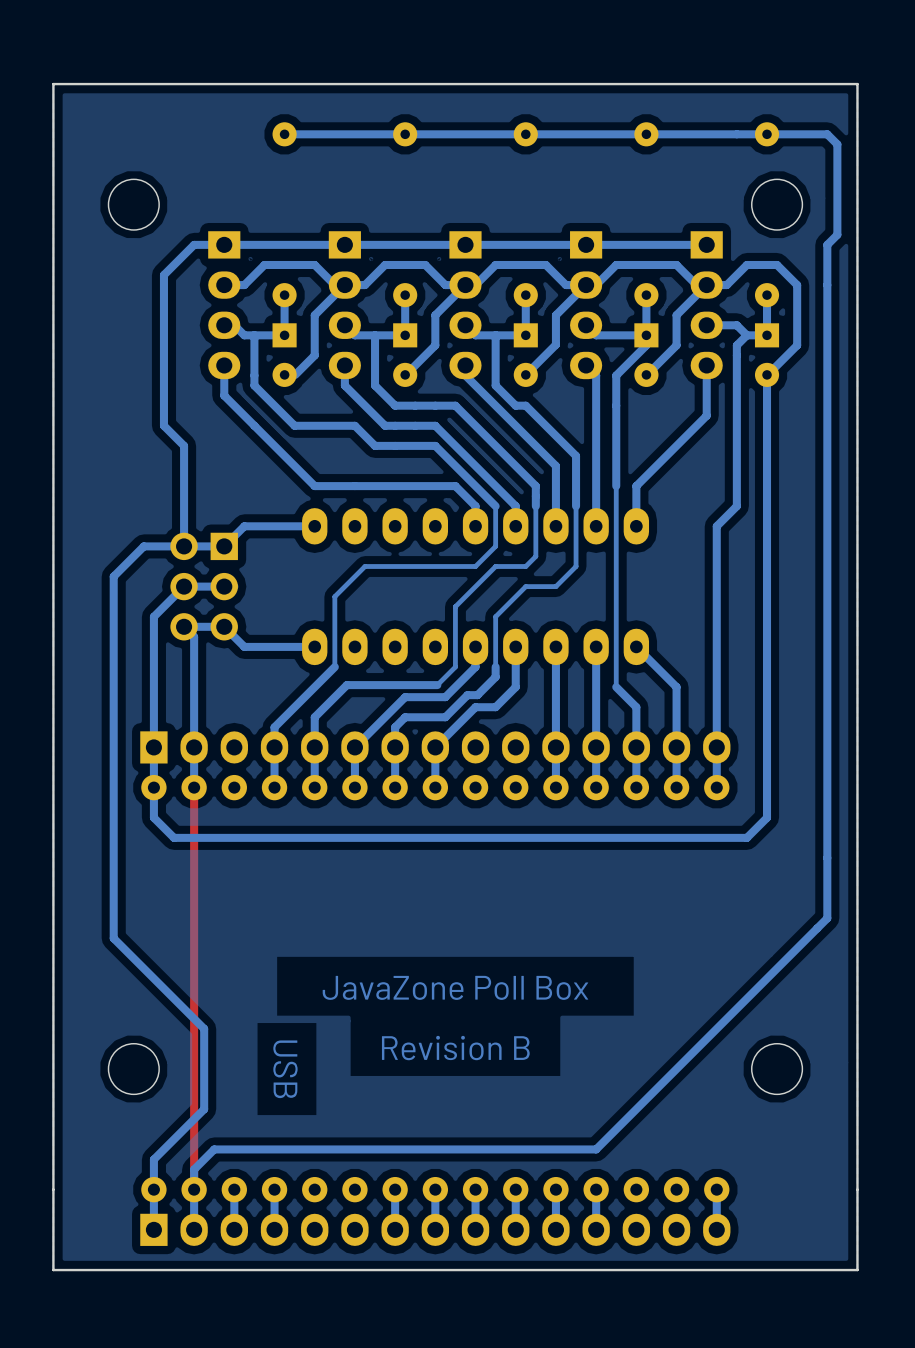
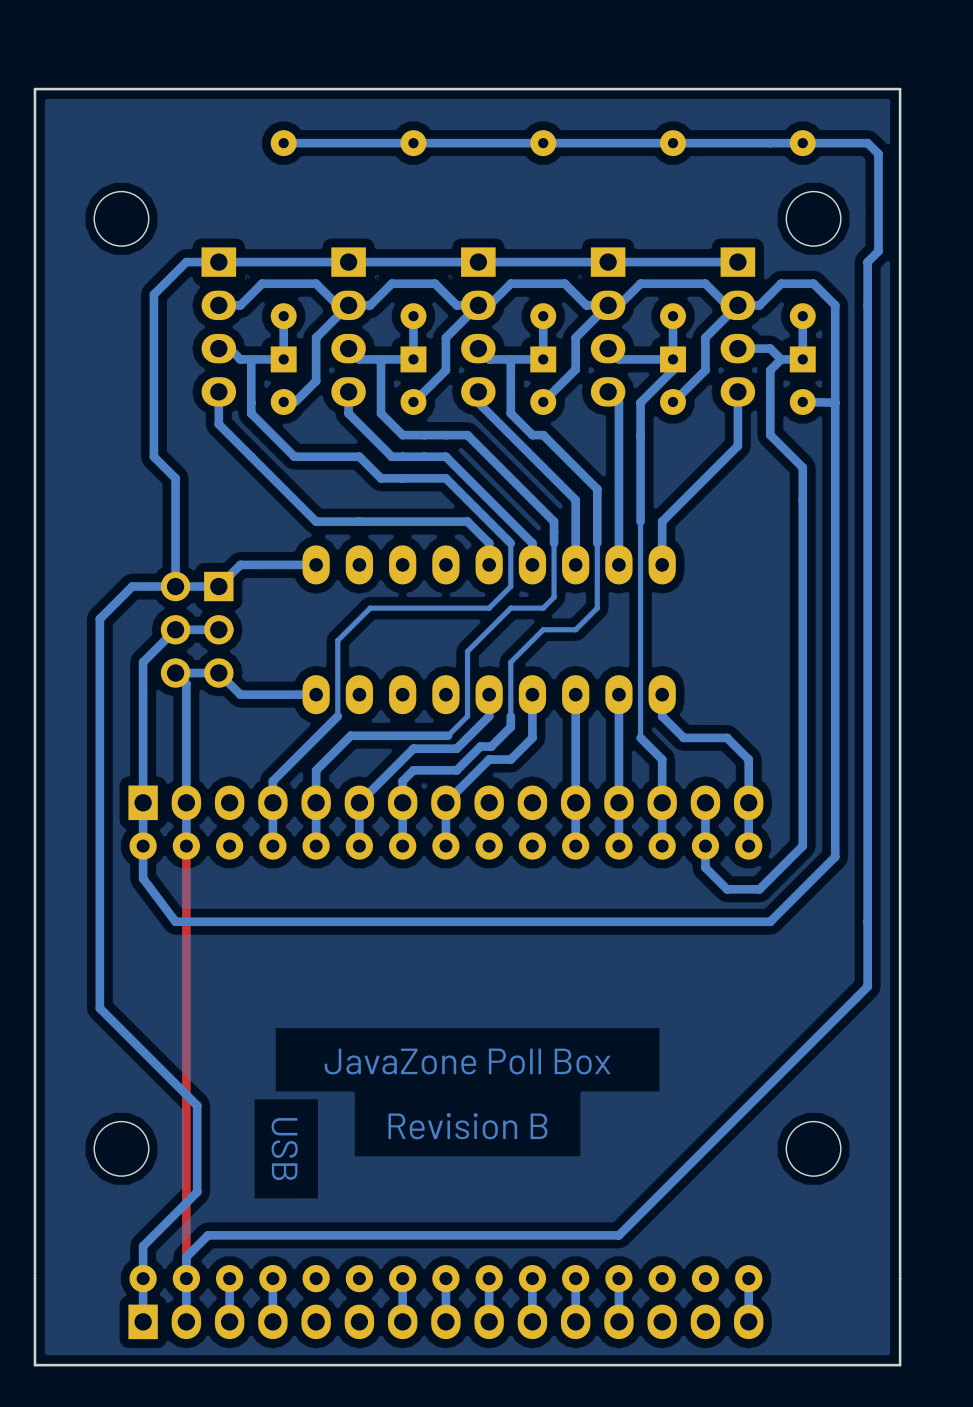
bottom track: (797, 345) (767, 374) (767, 435) -> (770, 435) (802, 467)
bottom track: none -> (803, 402) (835, 402)
bottom track: (736, 405) (736, 506) (716, 526) (716, 707) -> none
bottom track: (636, 646) (676, 687) (676, 747) -> (662, 694) (662, 716) (683, 737) (727, 737) (748, 759)
bottom track: (767, 787) (767, 817) (746, 837) (174, 837) (153, 817) -> (835, 370) (835, 856) (770, 921) (175, 921) (143, 878)
bottom track: none -> (802, 846) (759, 889) (727, 889) (705, 867) (705, 846)

